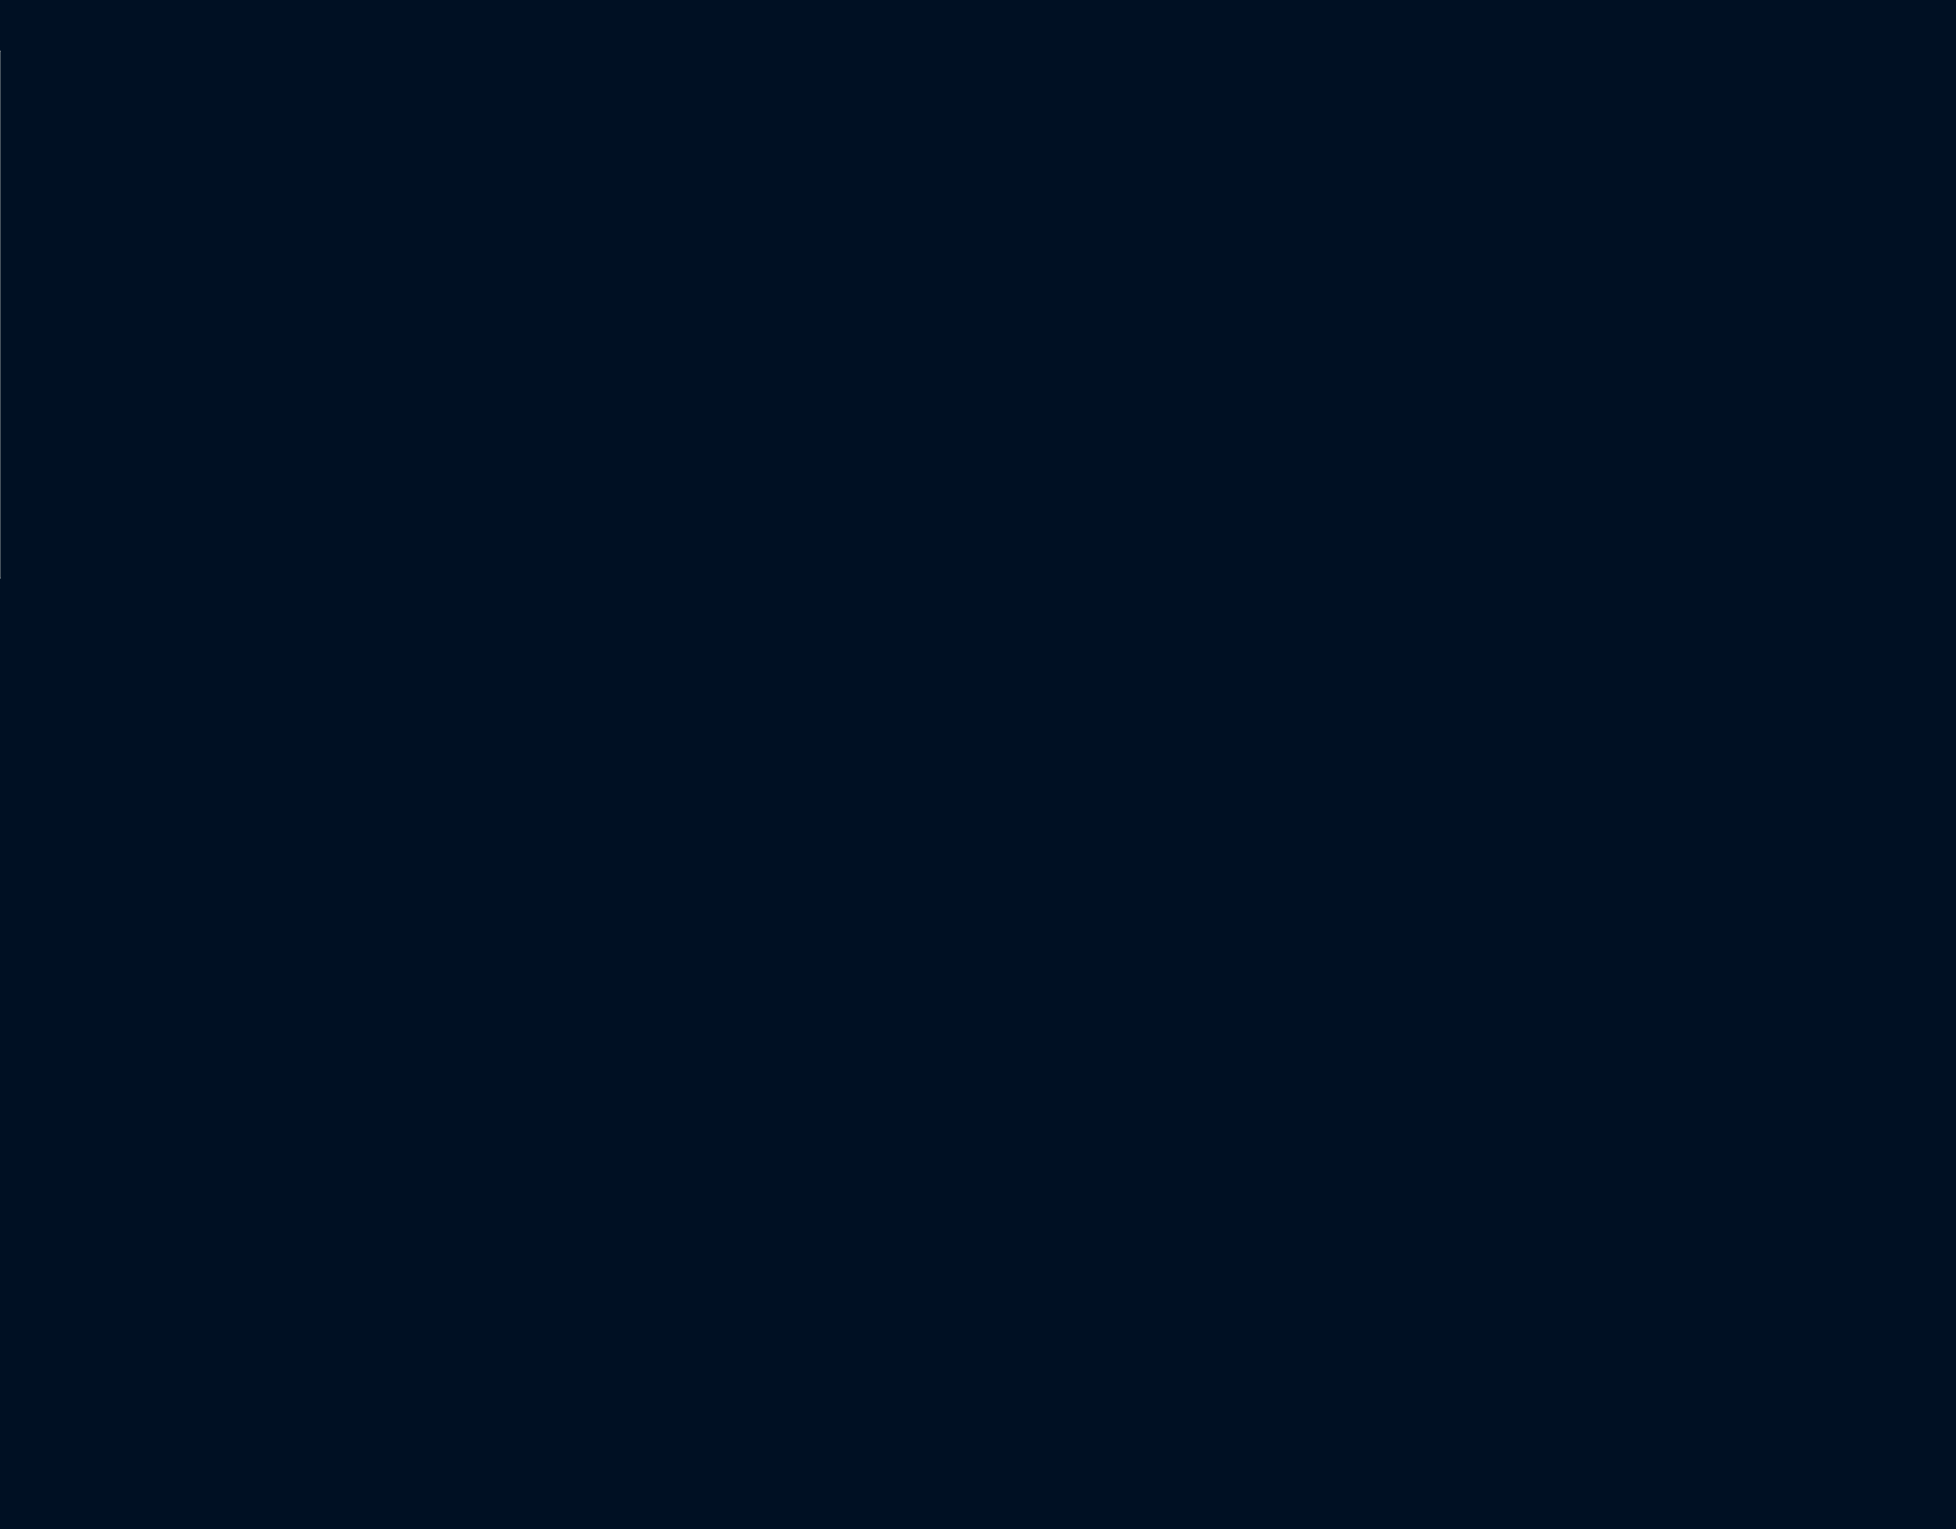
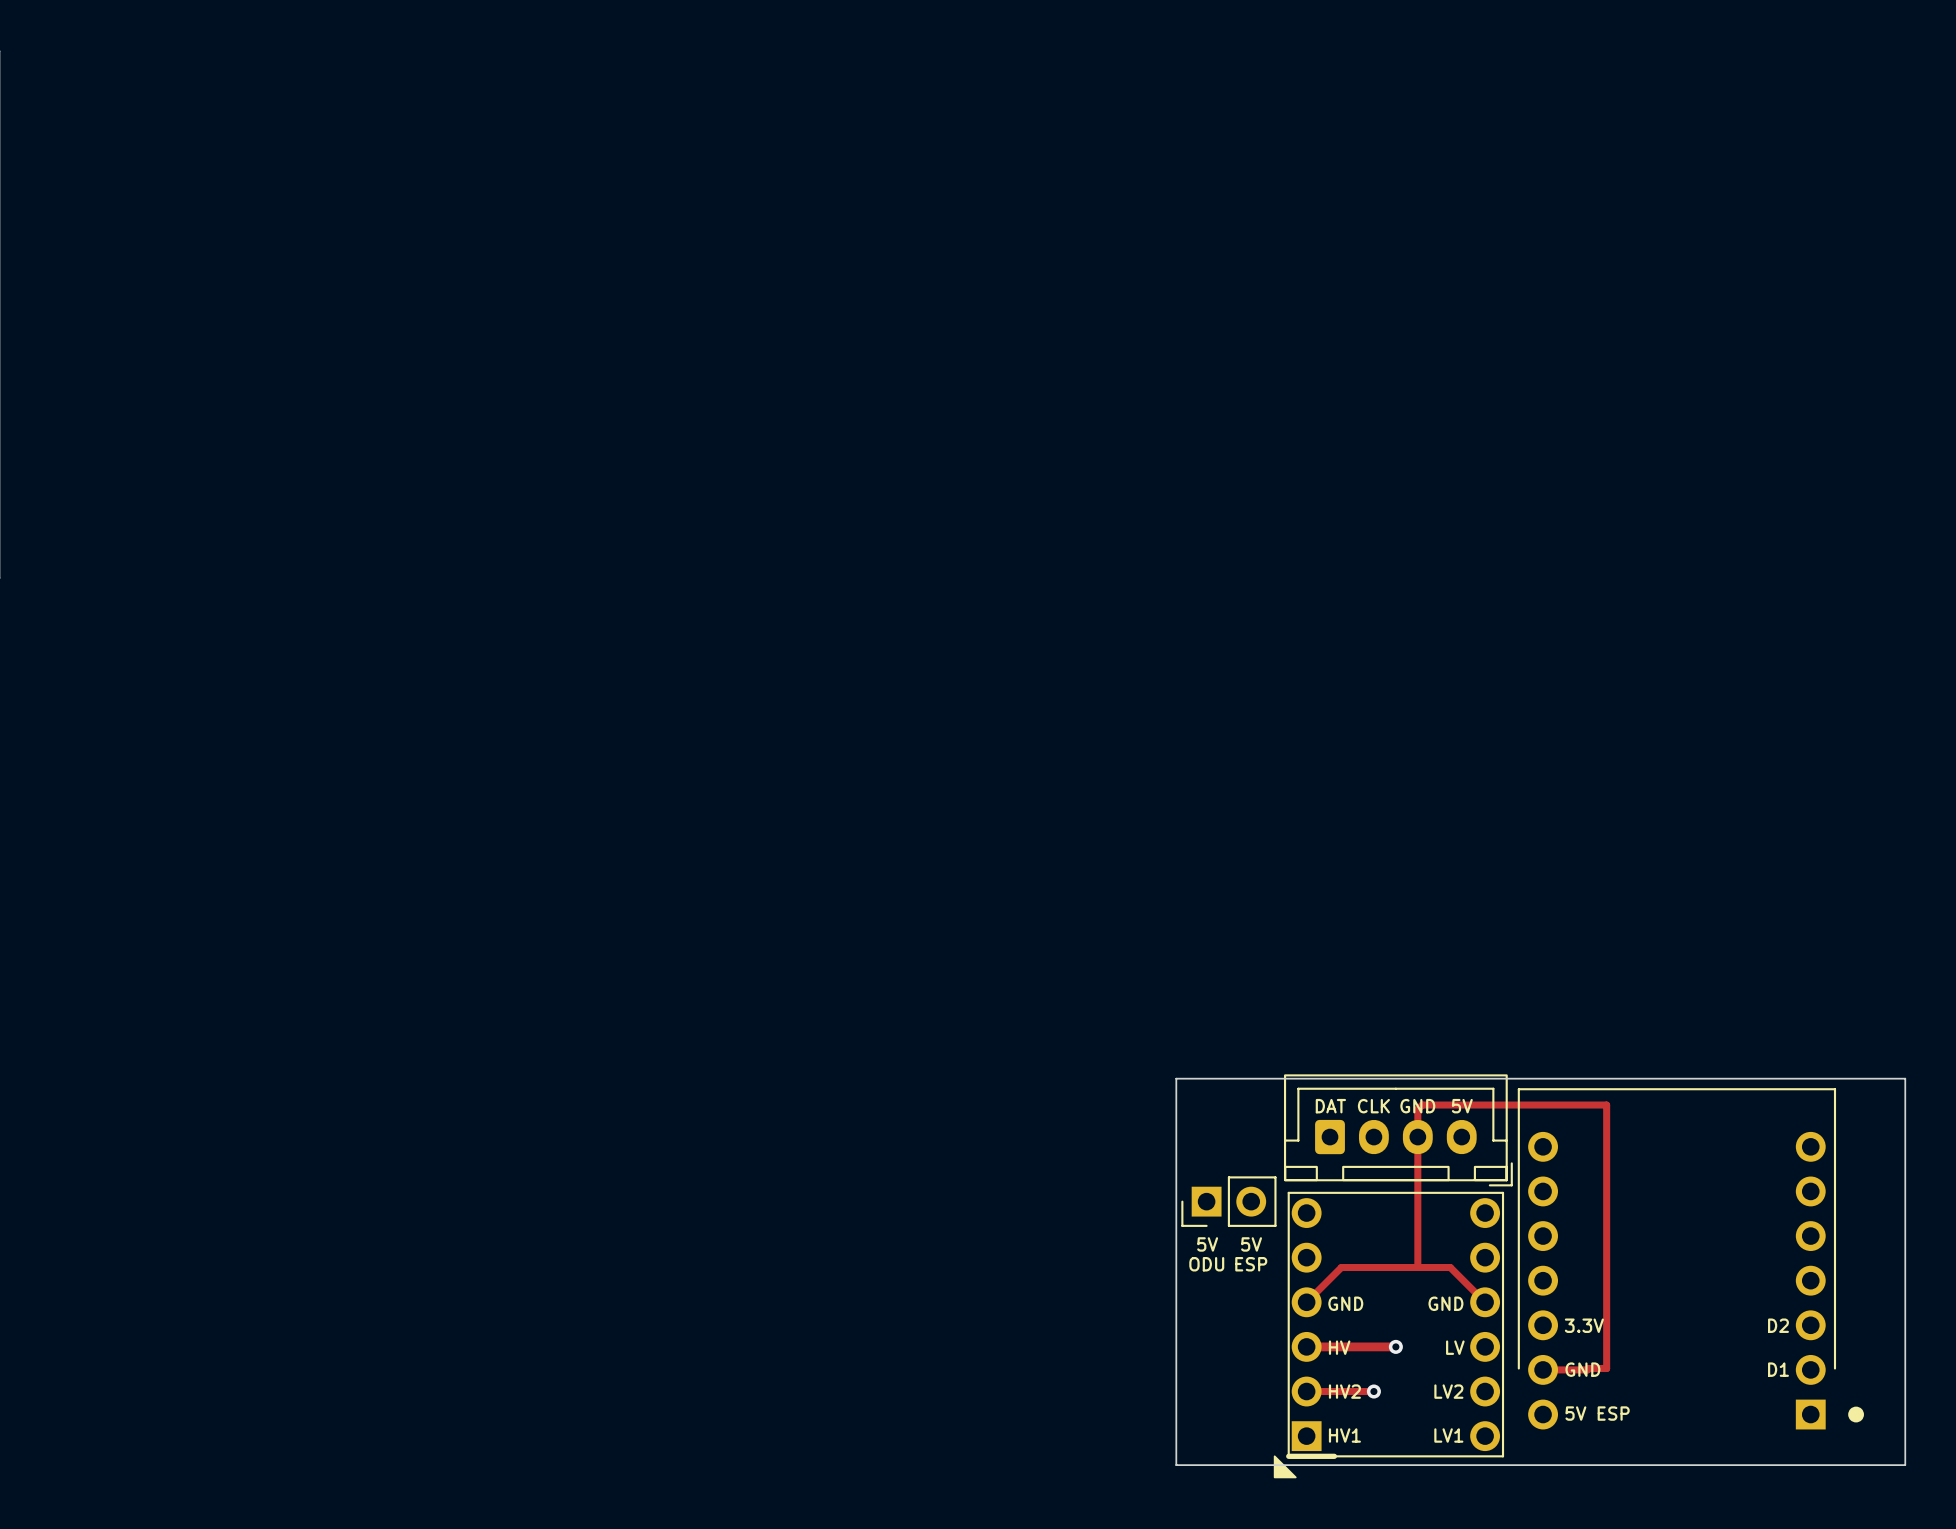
board edge: none -> (1176, 1078) (1905, 1078) (1905, 1465) (1176, 1465) (1176, 1078)
text: none -> DAT (1330, 1106)
text: none -> CLK (1373, 1106)
text: none -> GND (1417, 1106)
text: none -> 5V (1462, 1106)
part: none -> (1398, 1130)
part: none -> (1228, 1201)
text: none -> 5V (1207, 1244)
text: none -> 5V (1251, 1244)
part: none -> (1690, 1258)
text: none -> ODU (1206, 1264)
text: none -> ESP (1251, 1264)
track: none -> (1417, 1267) (1417, 1109) (1422, 1105) (1606, 1105) (1606, 1368) (1543, 1369)
track: none -> (1306, 1302) (1341, 1267) (1450, 1267) (1485, 1302)
text: none -> GND (1345, 1303)
text: none -> GND (1445, 1303)
text: none -> 3.3V (1584, 1325)
text: none -> D2 (1778, 1325)
part: none -> (1388, 1335)
track: none -> (1306, 1346) (1395, 1346)
via: none -> (1395, 1346)
text: none -> HV (1339, 1347)
text: none -> LV (1455, 1347)
text: none -> GND (1582, 1369)
text: none -> D1 (1778, 1369)
track: none -> (1306, 1391) (1373, 1391)
text: none -> HV2 (1344, 1391)
via: none -> (1373, 1391)
text: none -> LV2 (1448, 1391)
text: none -> 5V ESP (1597, 1413)
text: none -> HV1 (1344, 1435)
text: none -> LV1 (1448, 1435)

